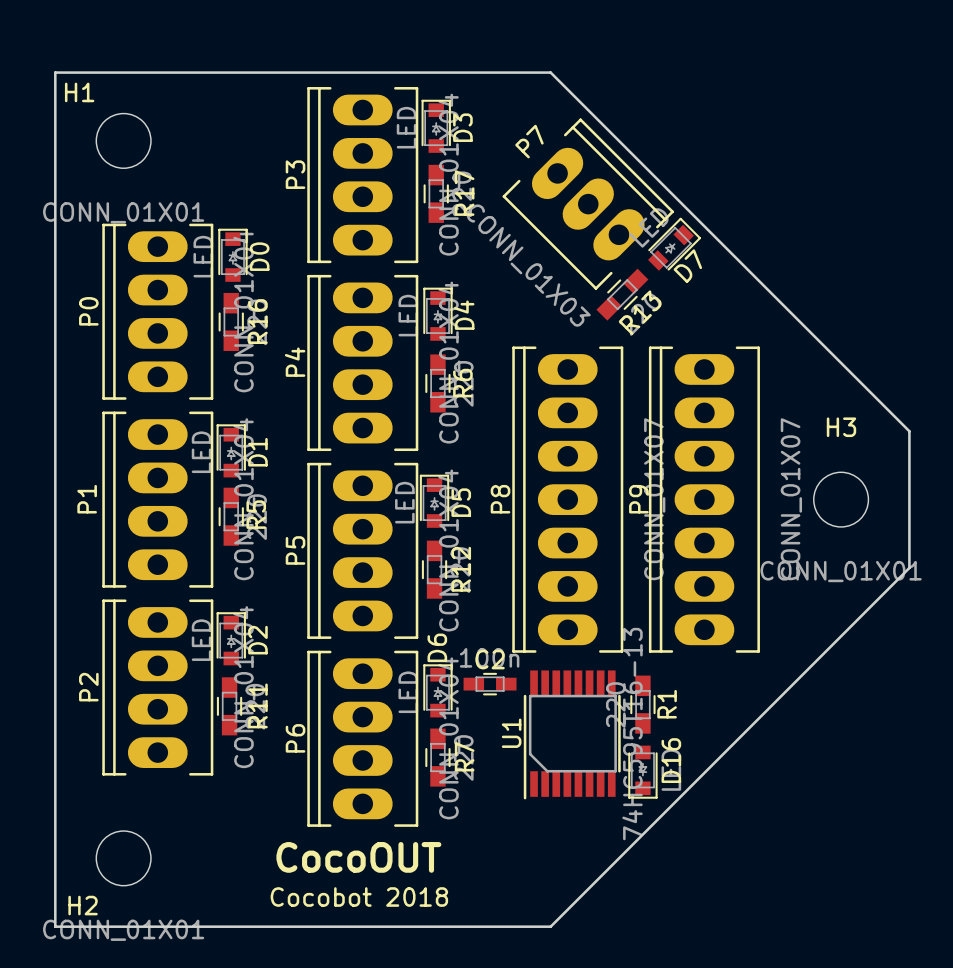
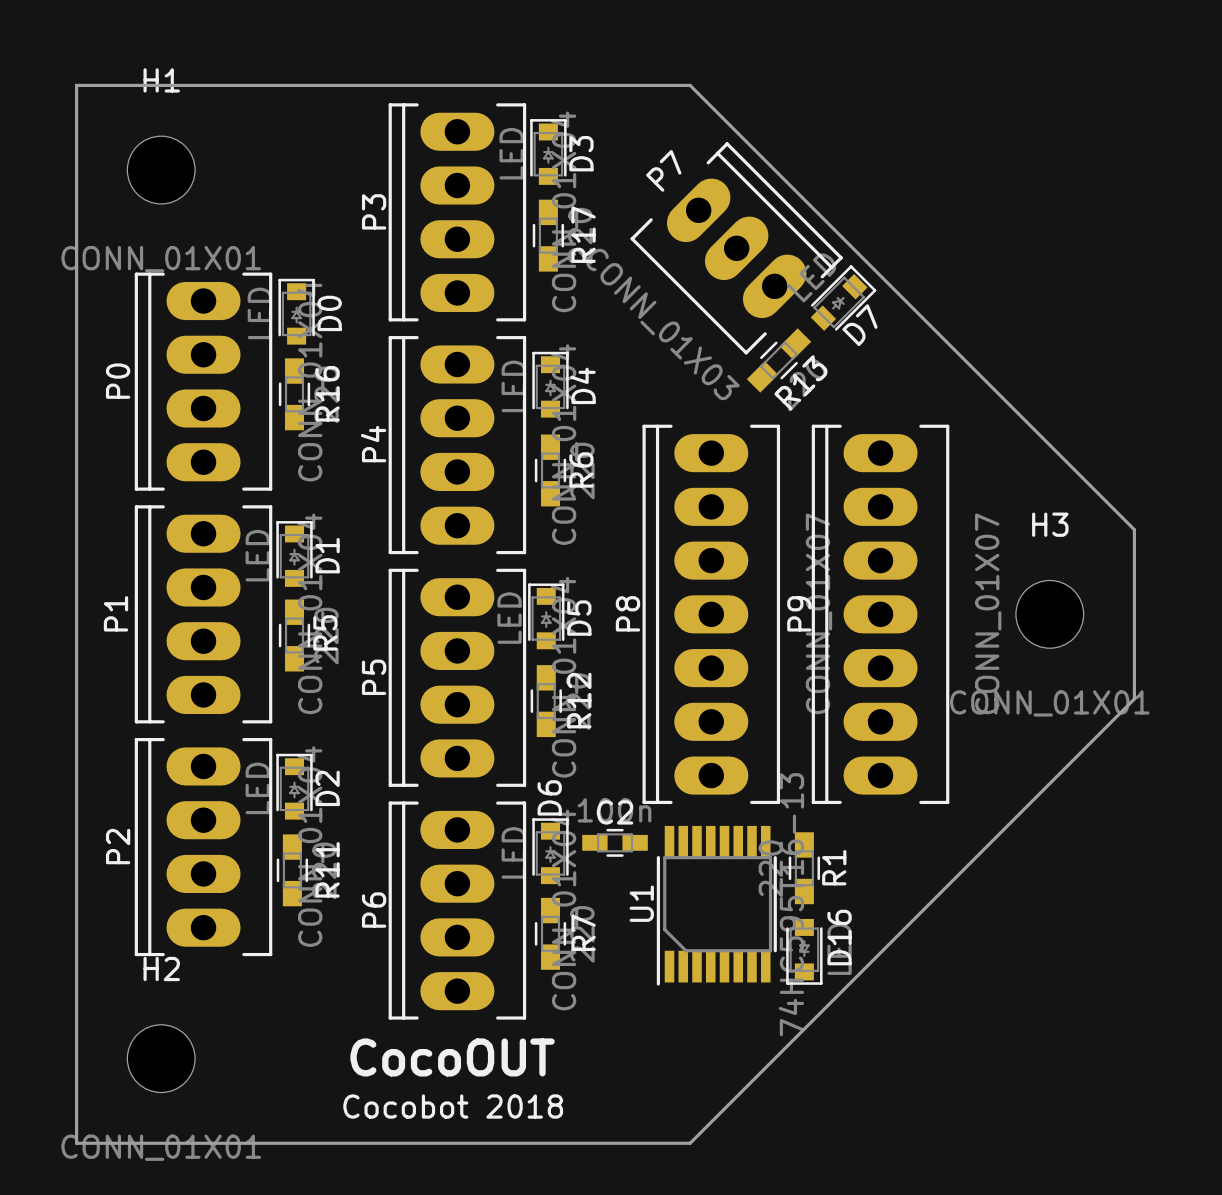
H1 name position: H1 (79, 92) -> H1 (161, 80)
H2 name position: H2 (83, 905) -> H2 (161, 968)

